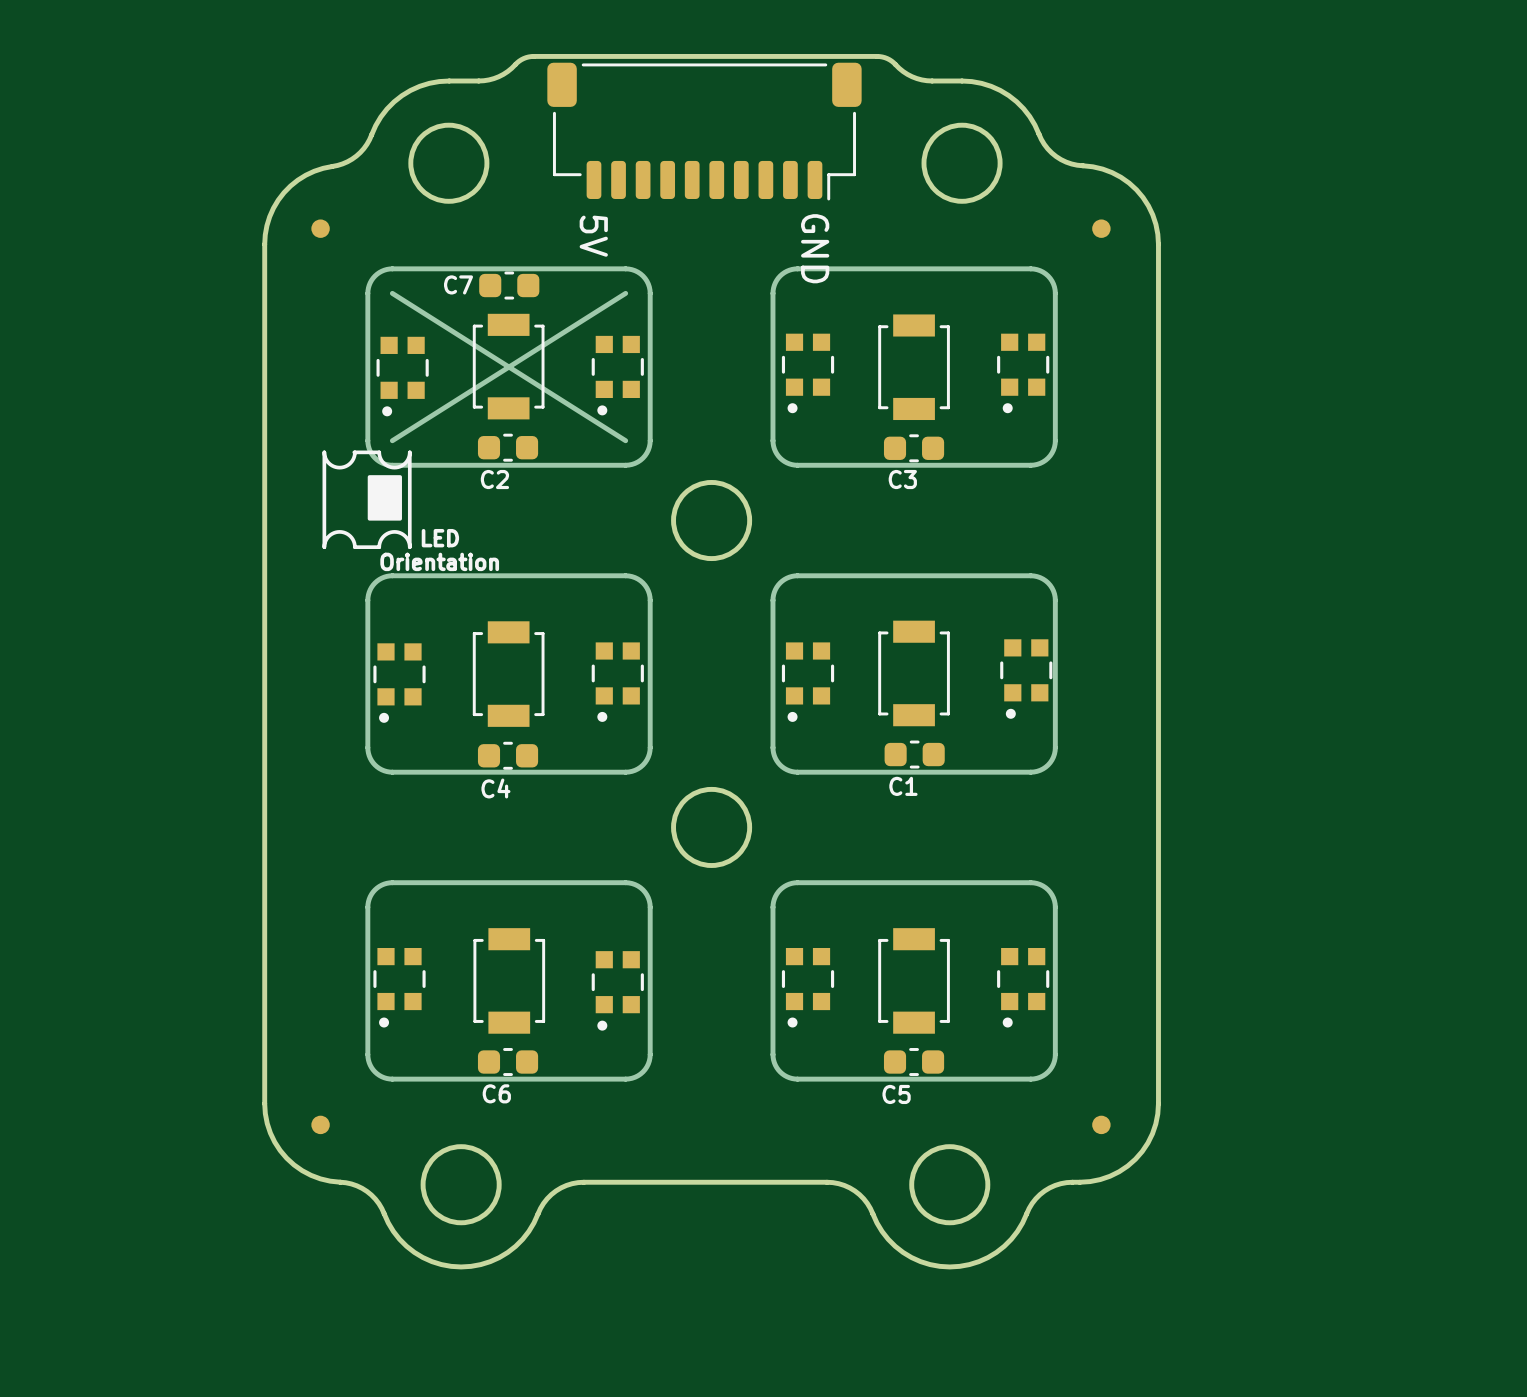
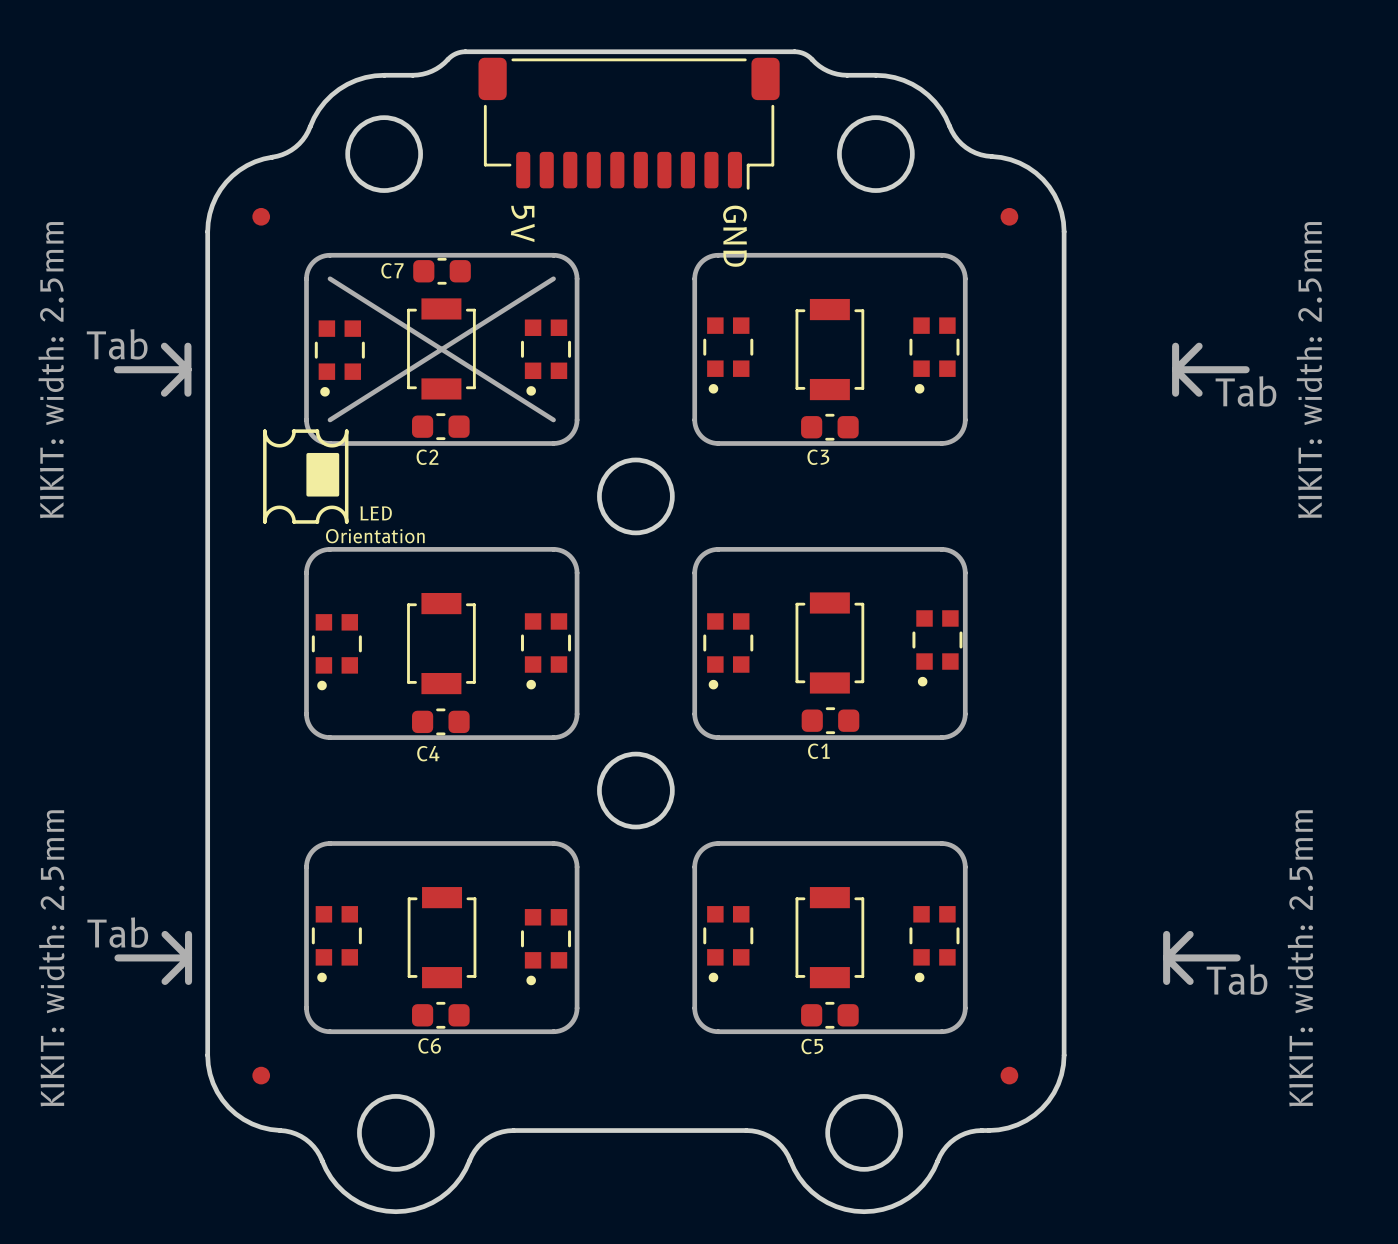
drawing: none -> [113, 342, 192, 397]
drawing: none -> [1172, 342, 1250, 397]
drawing: none -> [114, 930, 193, 986]
drawing: none -> [1163, 930, 1241, 986]

